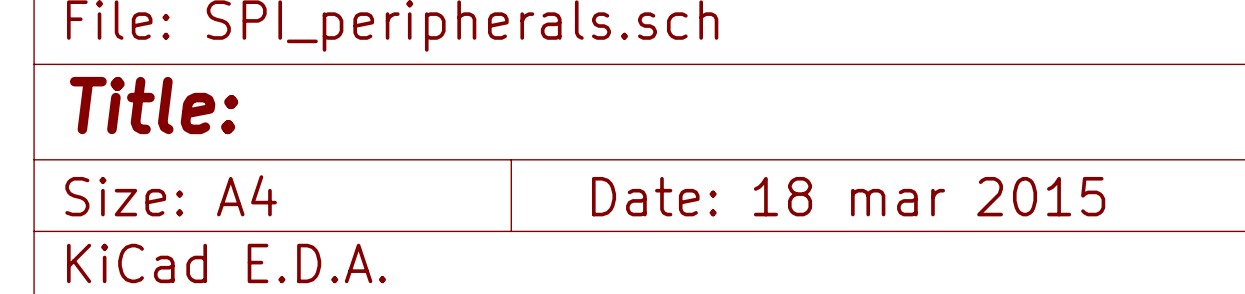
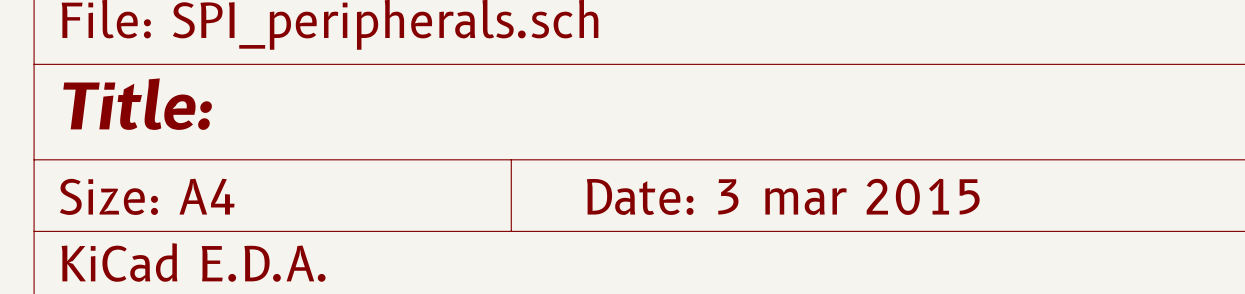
title block: Date: 18 mar 2015 (848, 196) -> Date: 3 mar 2015 (783, 196)

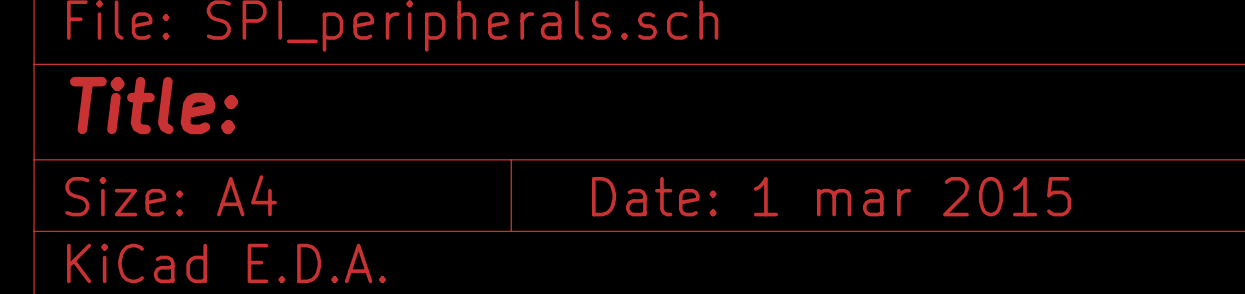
title block: Date: 3 mar 2015 (783, 196) -> Date: 1 mar 2015 (831, 196)

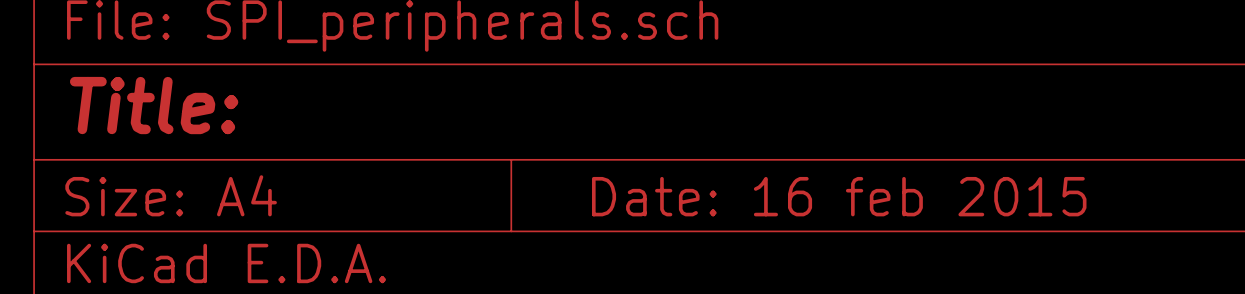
title block: Date: 1 mar 2015 (831, 196) -> Date: 16 feb 2015 (839, 196)

